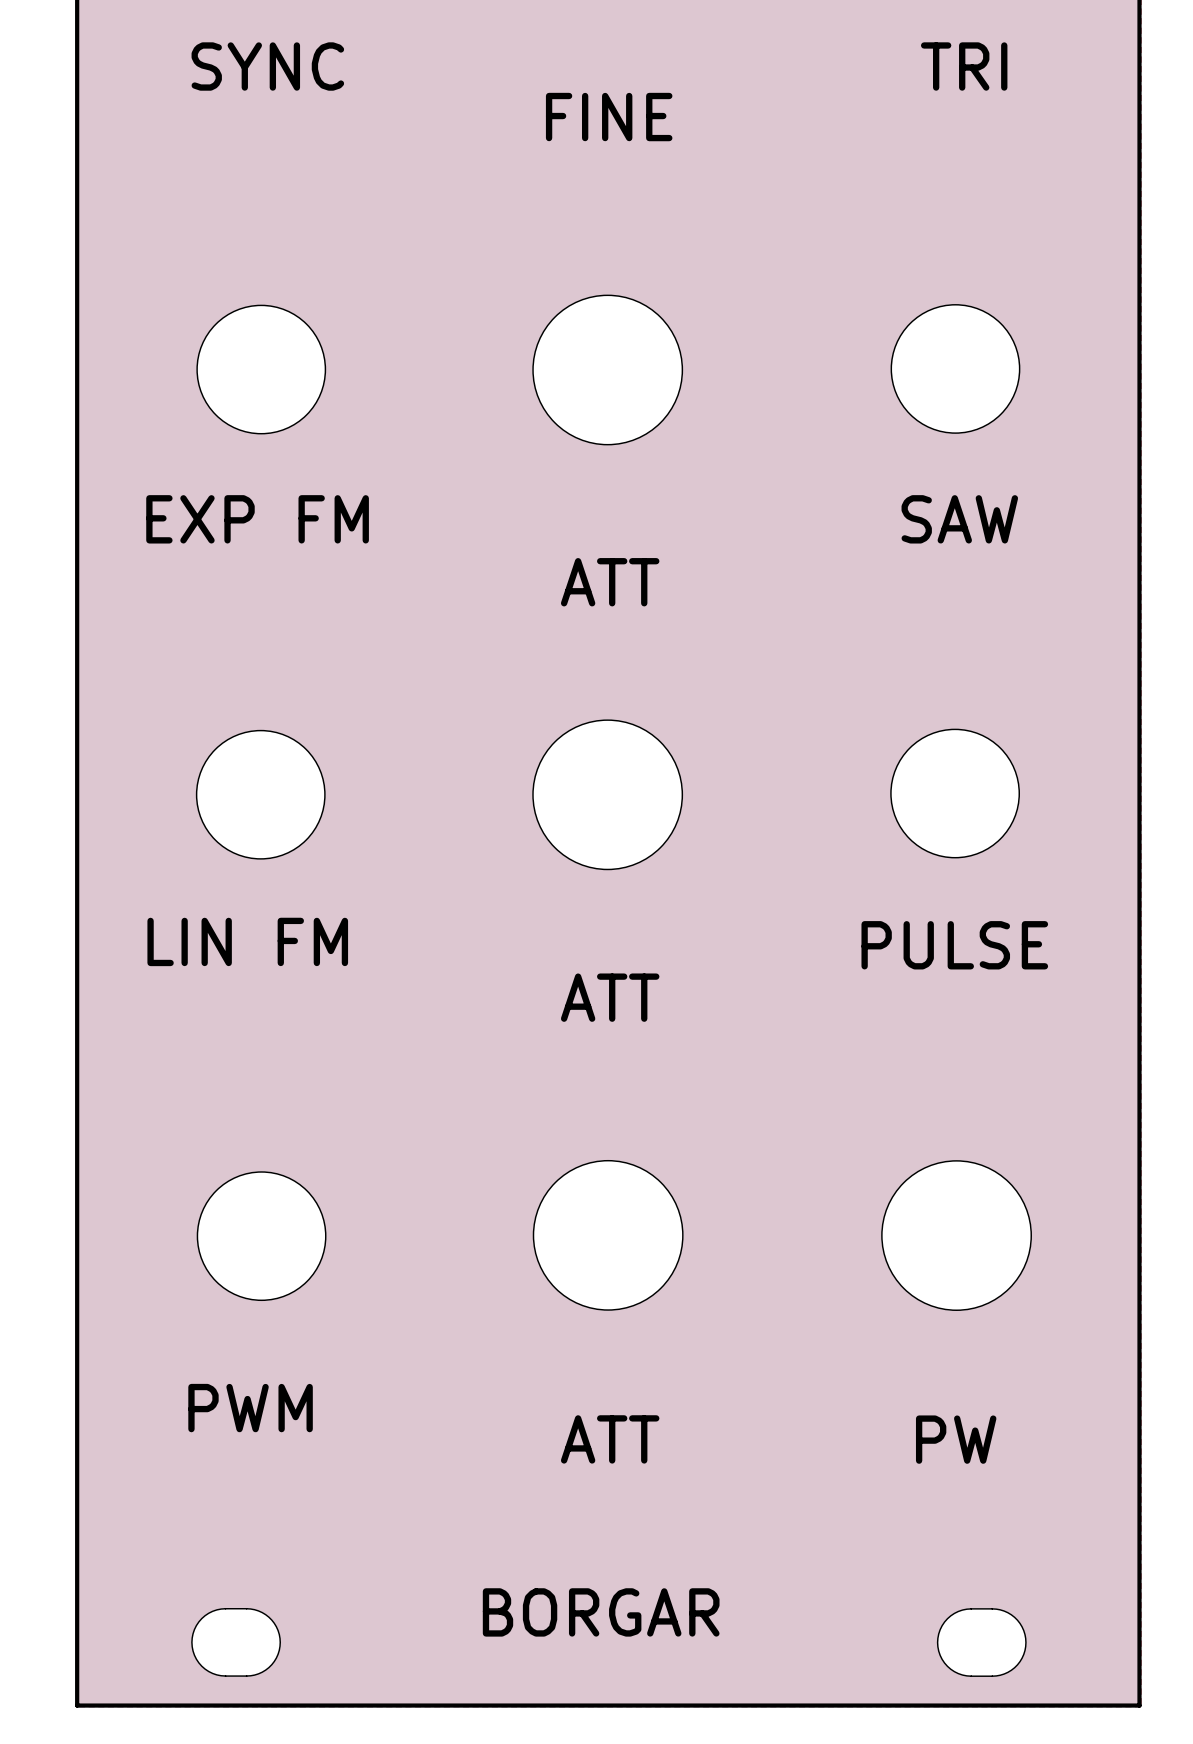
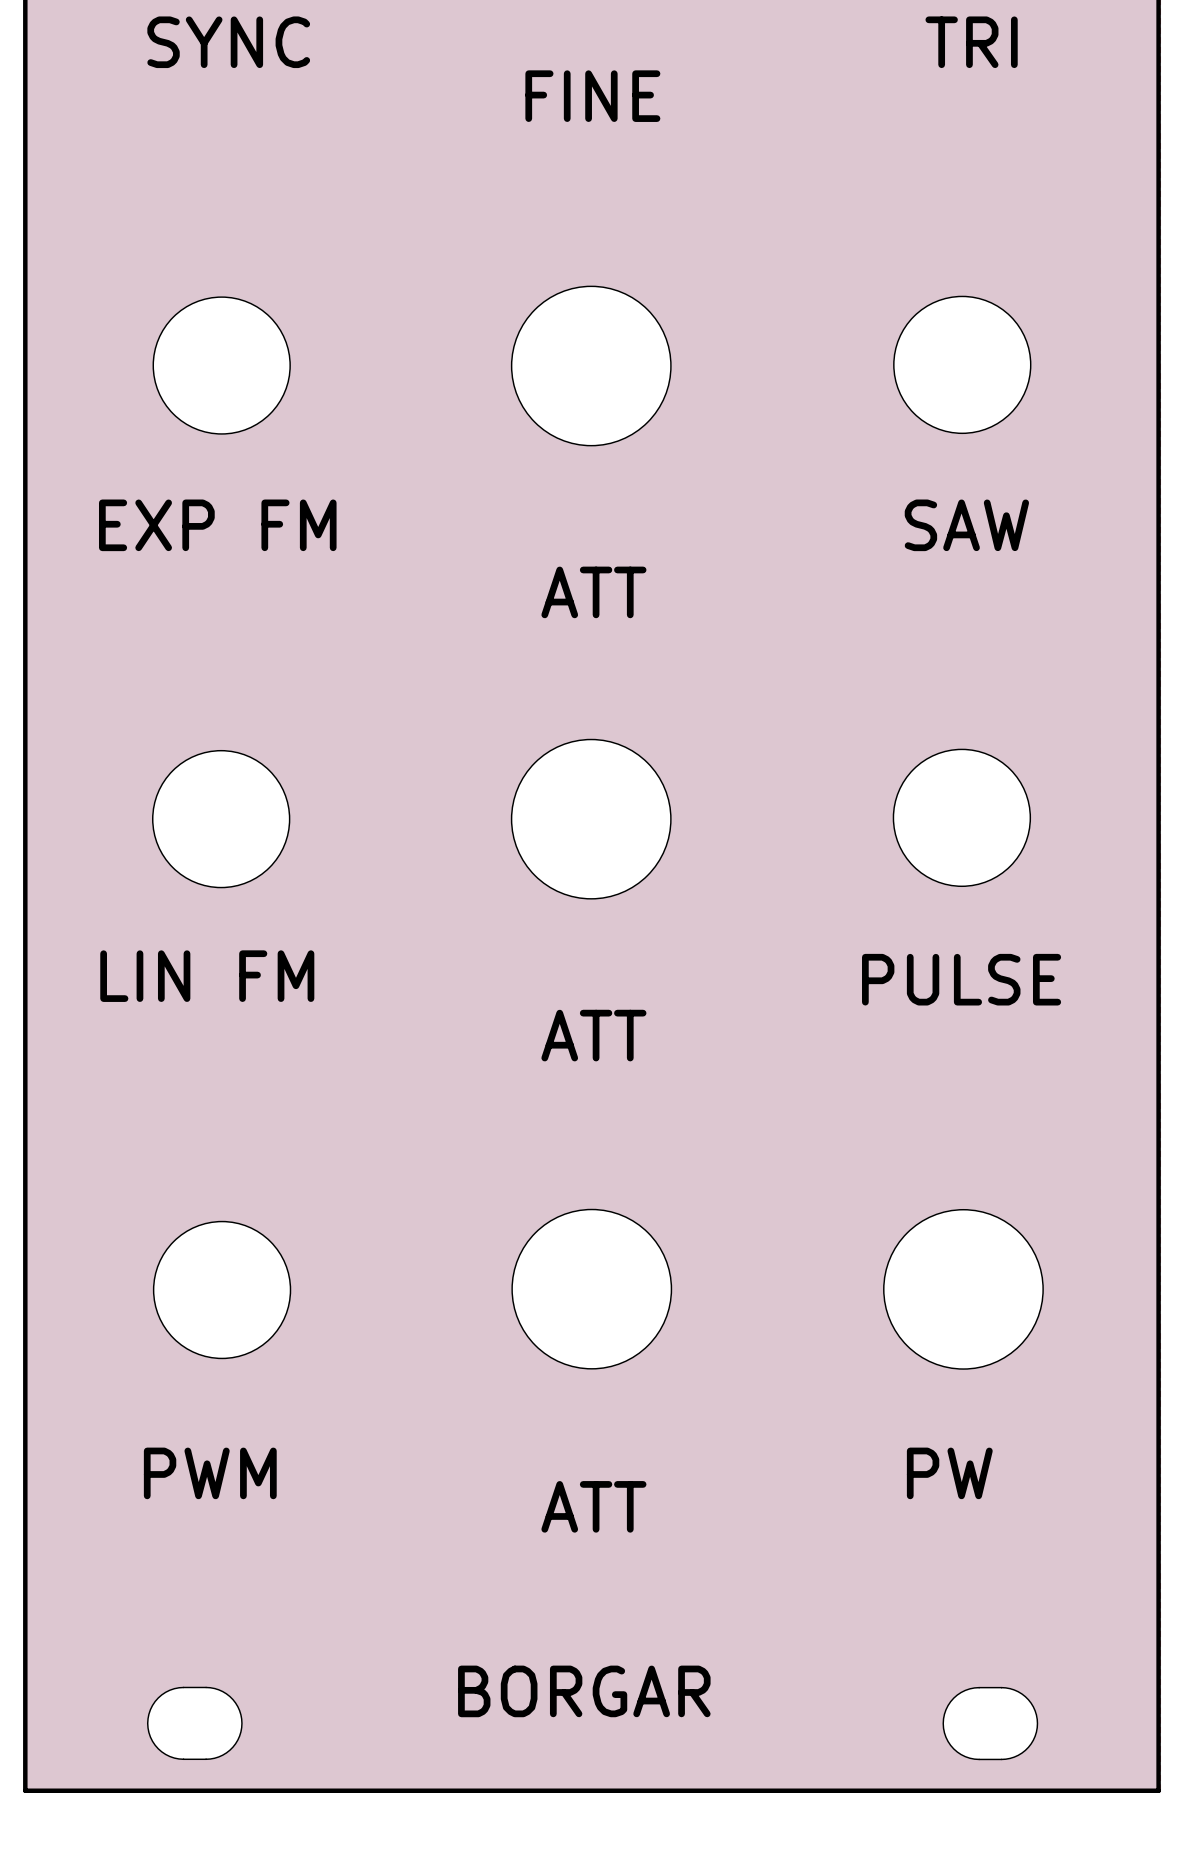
text position: PW (956, 1439) -> PW (949, 1473)

